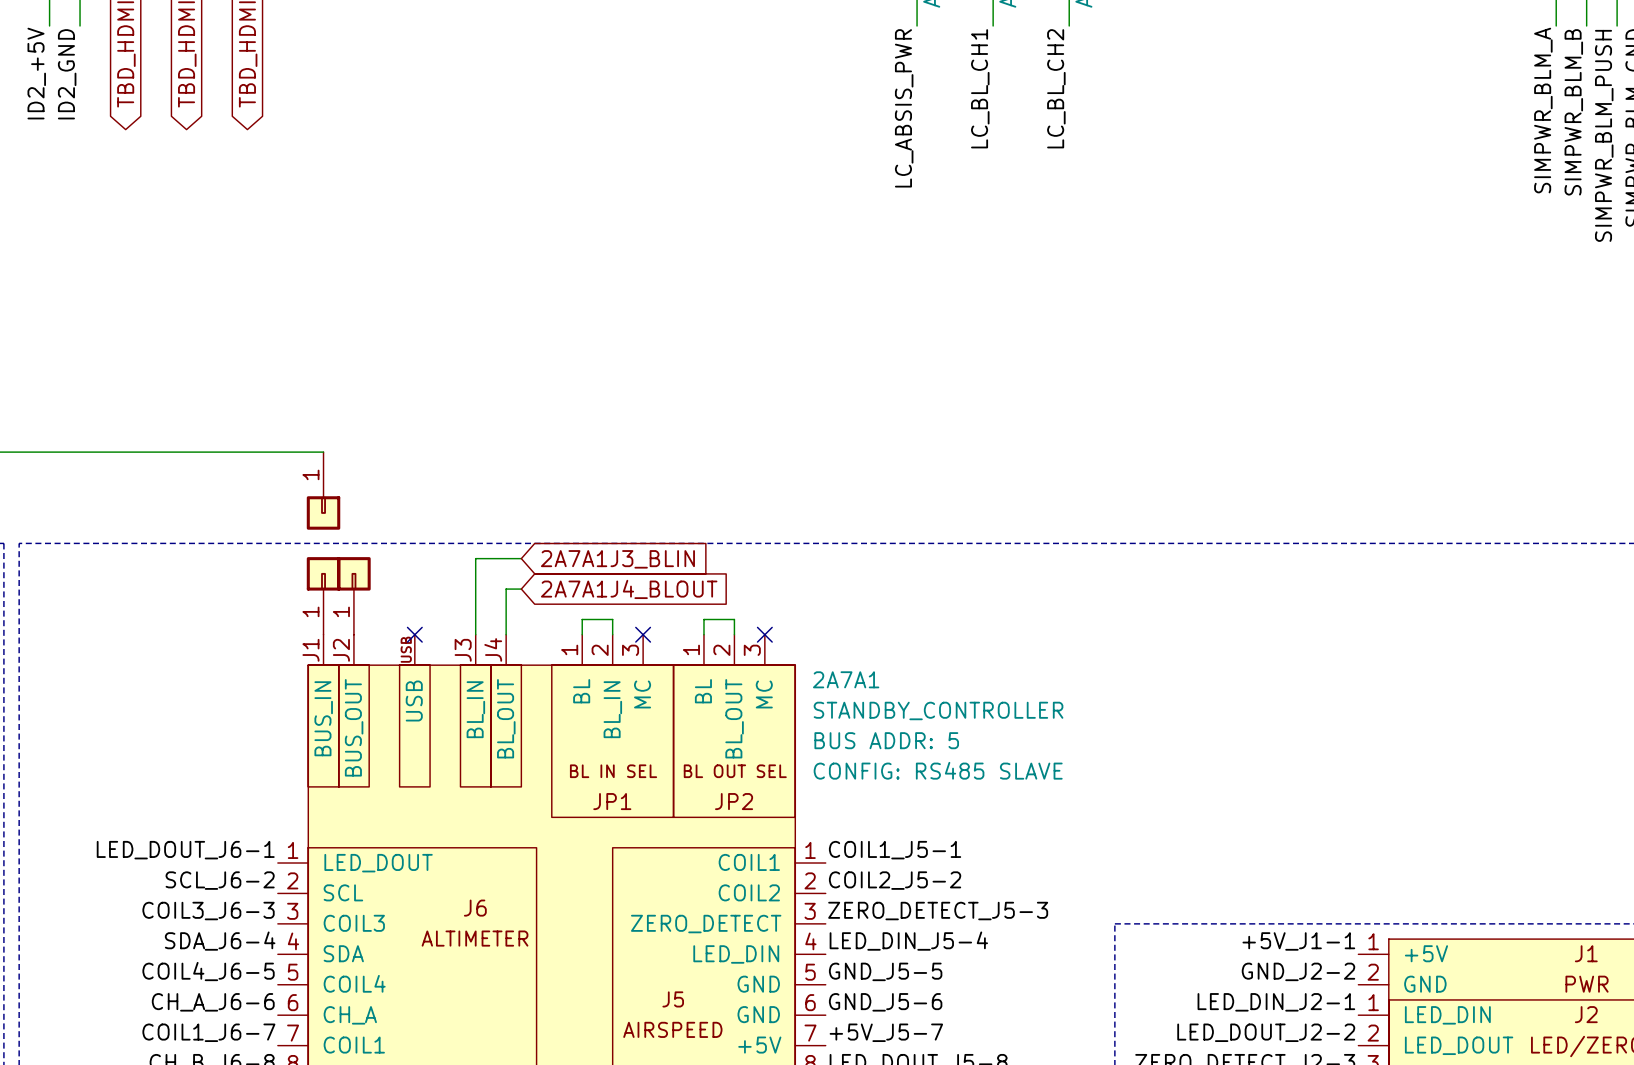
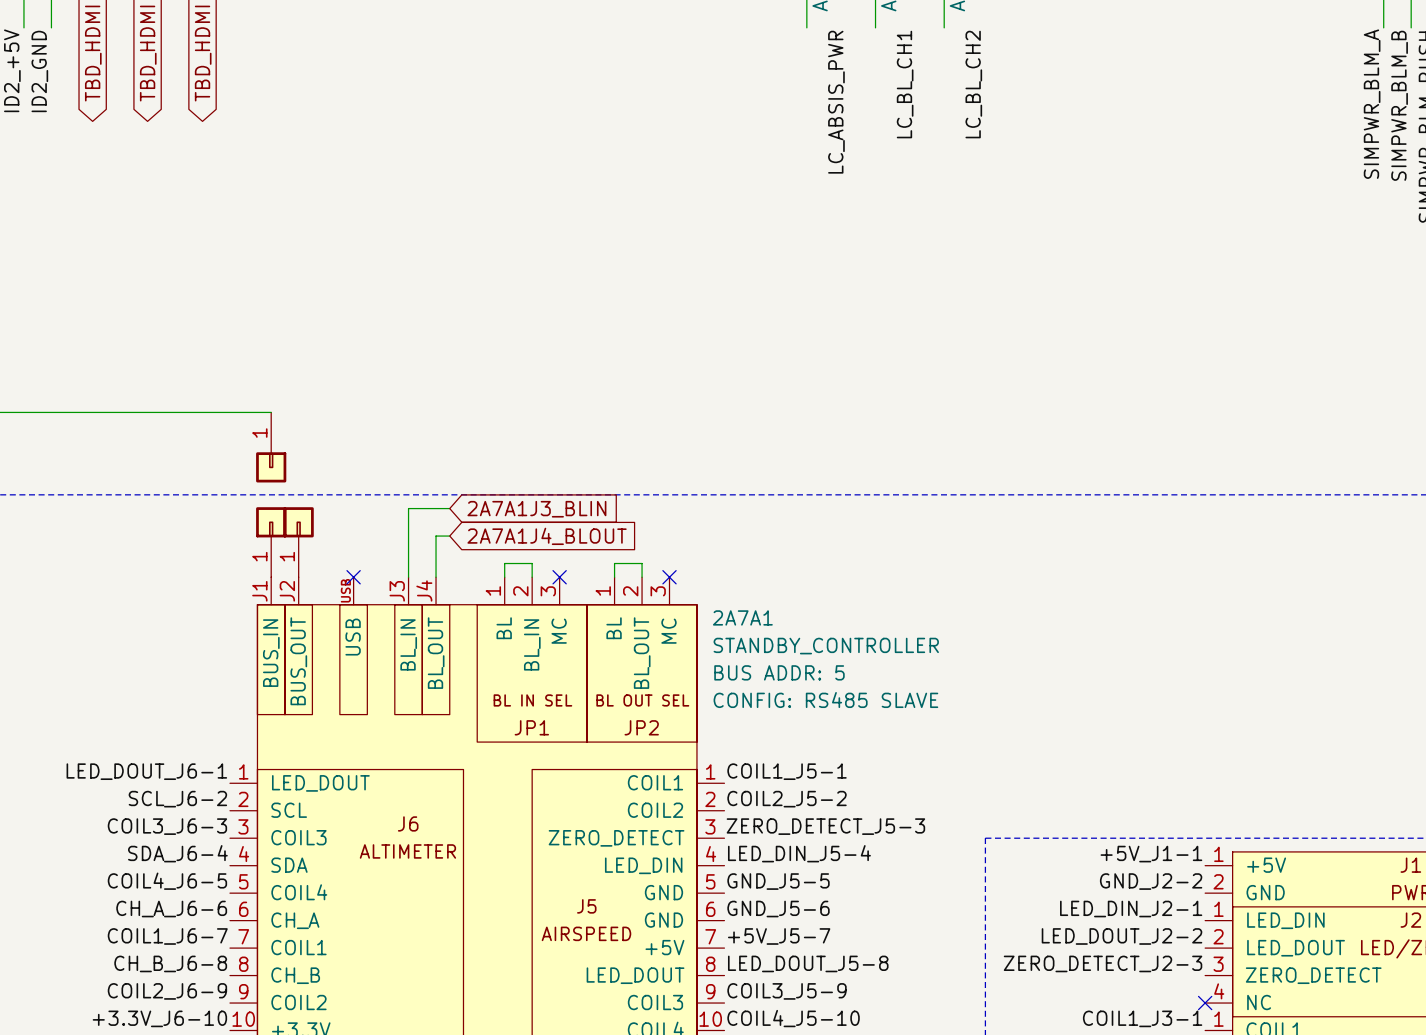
label position: LC_BL_CH1 (980, 88) -> LC_BL_CH1 (905, 84)
label position: LC_BL_CH2 (1056, 88) -> LC_BL_CH2 (973, 84)
label position: LC_ABSIS_PWR (904, 108) -> LC_ABSIS_PWR (836, 102)

